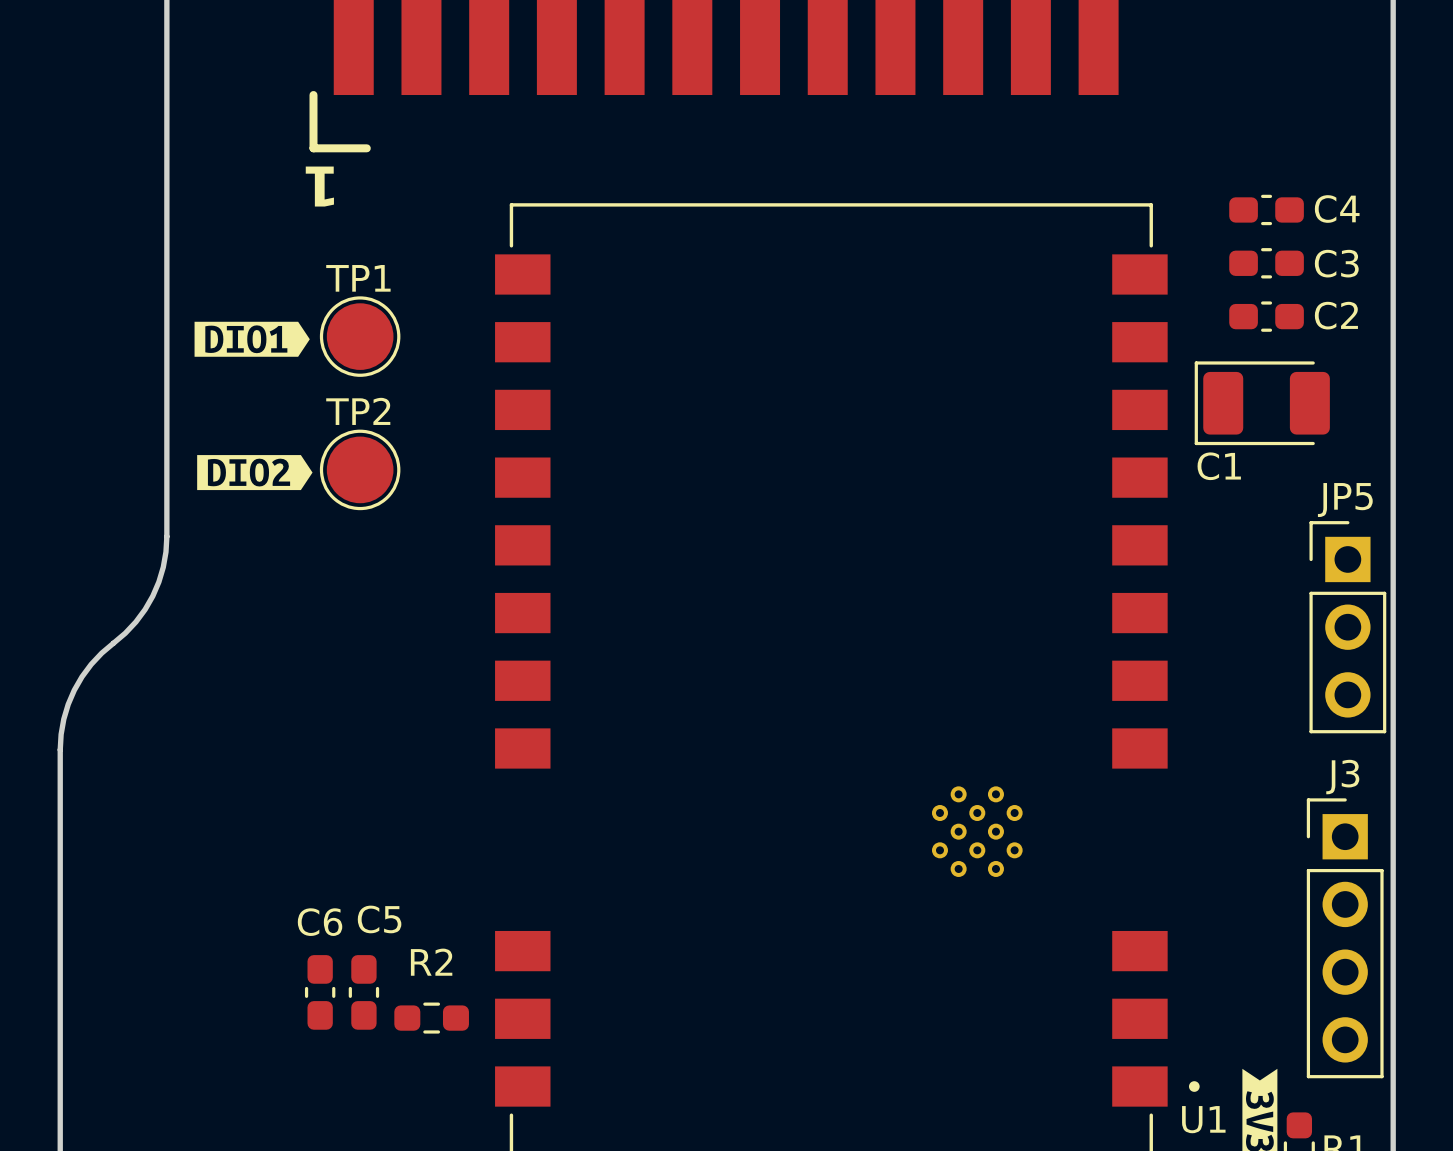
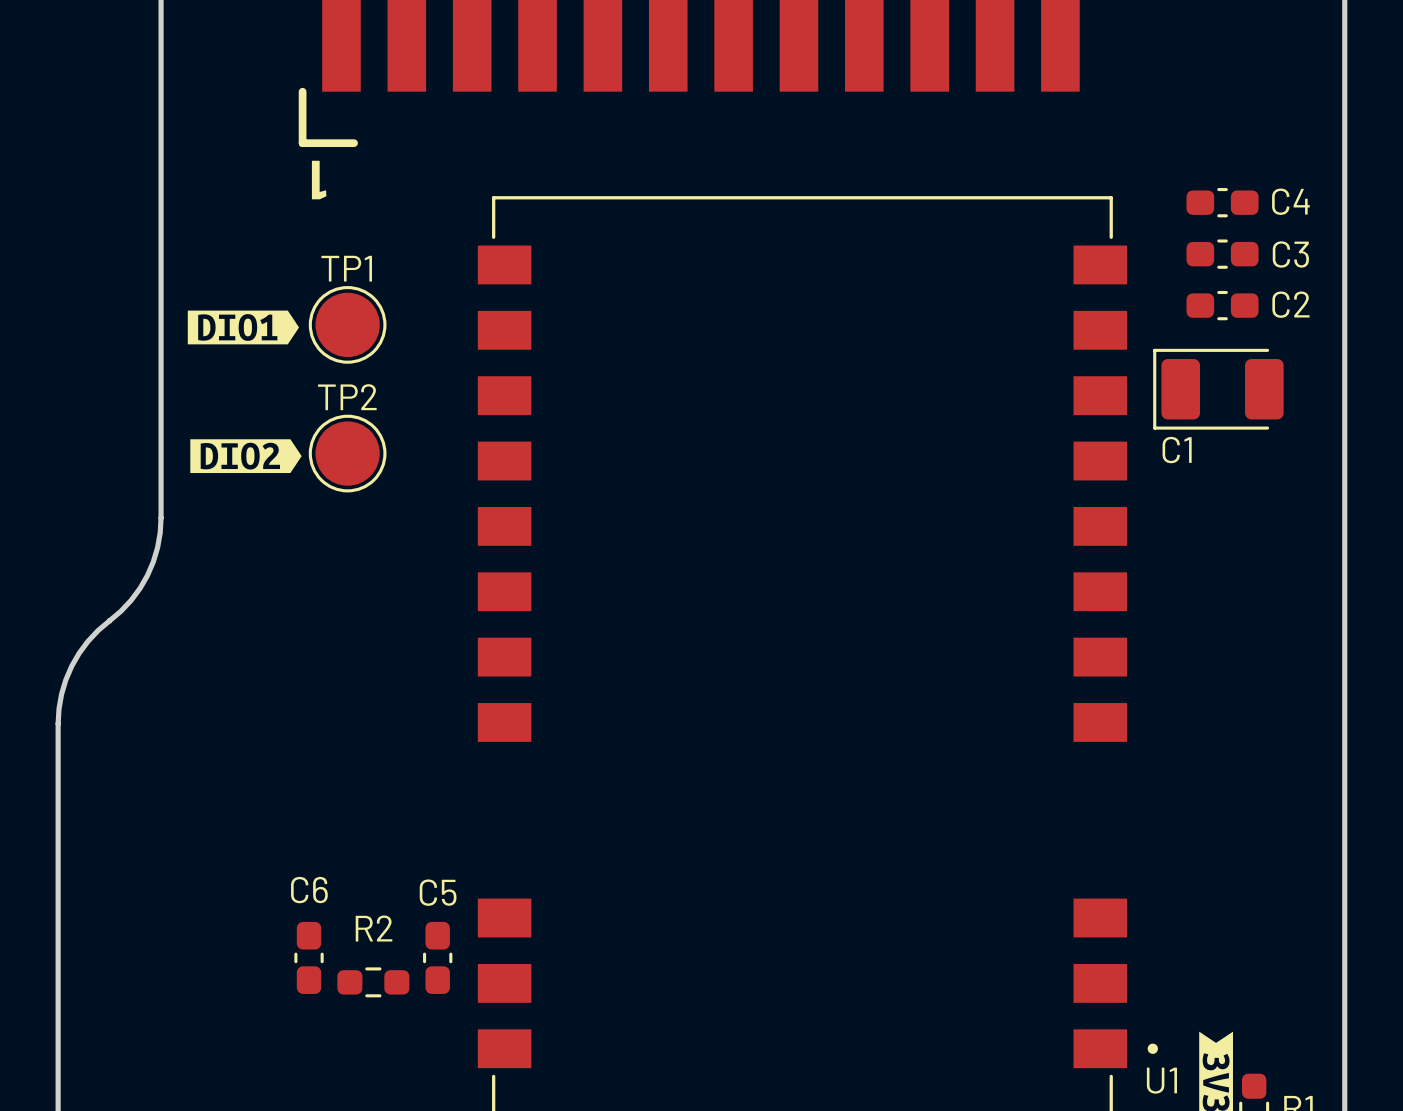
JP5: (1347, 627) -> none
part: (977, 831) -> none
C5 name position: C5 (379, 919) -> C5 (438, 892)
J3: (1345, 938) -> none
C5 position: (363, 992) -> (437, 957)
R2 position: (431, 1018) -> (373, 982)

